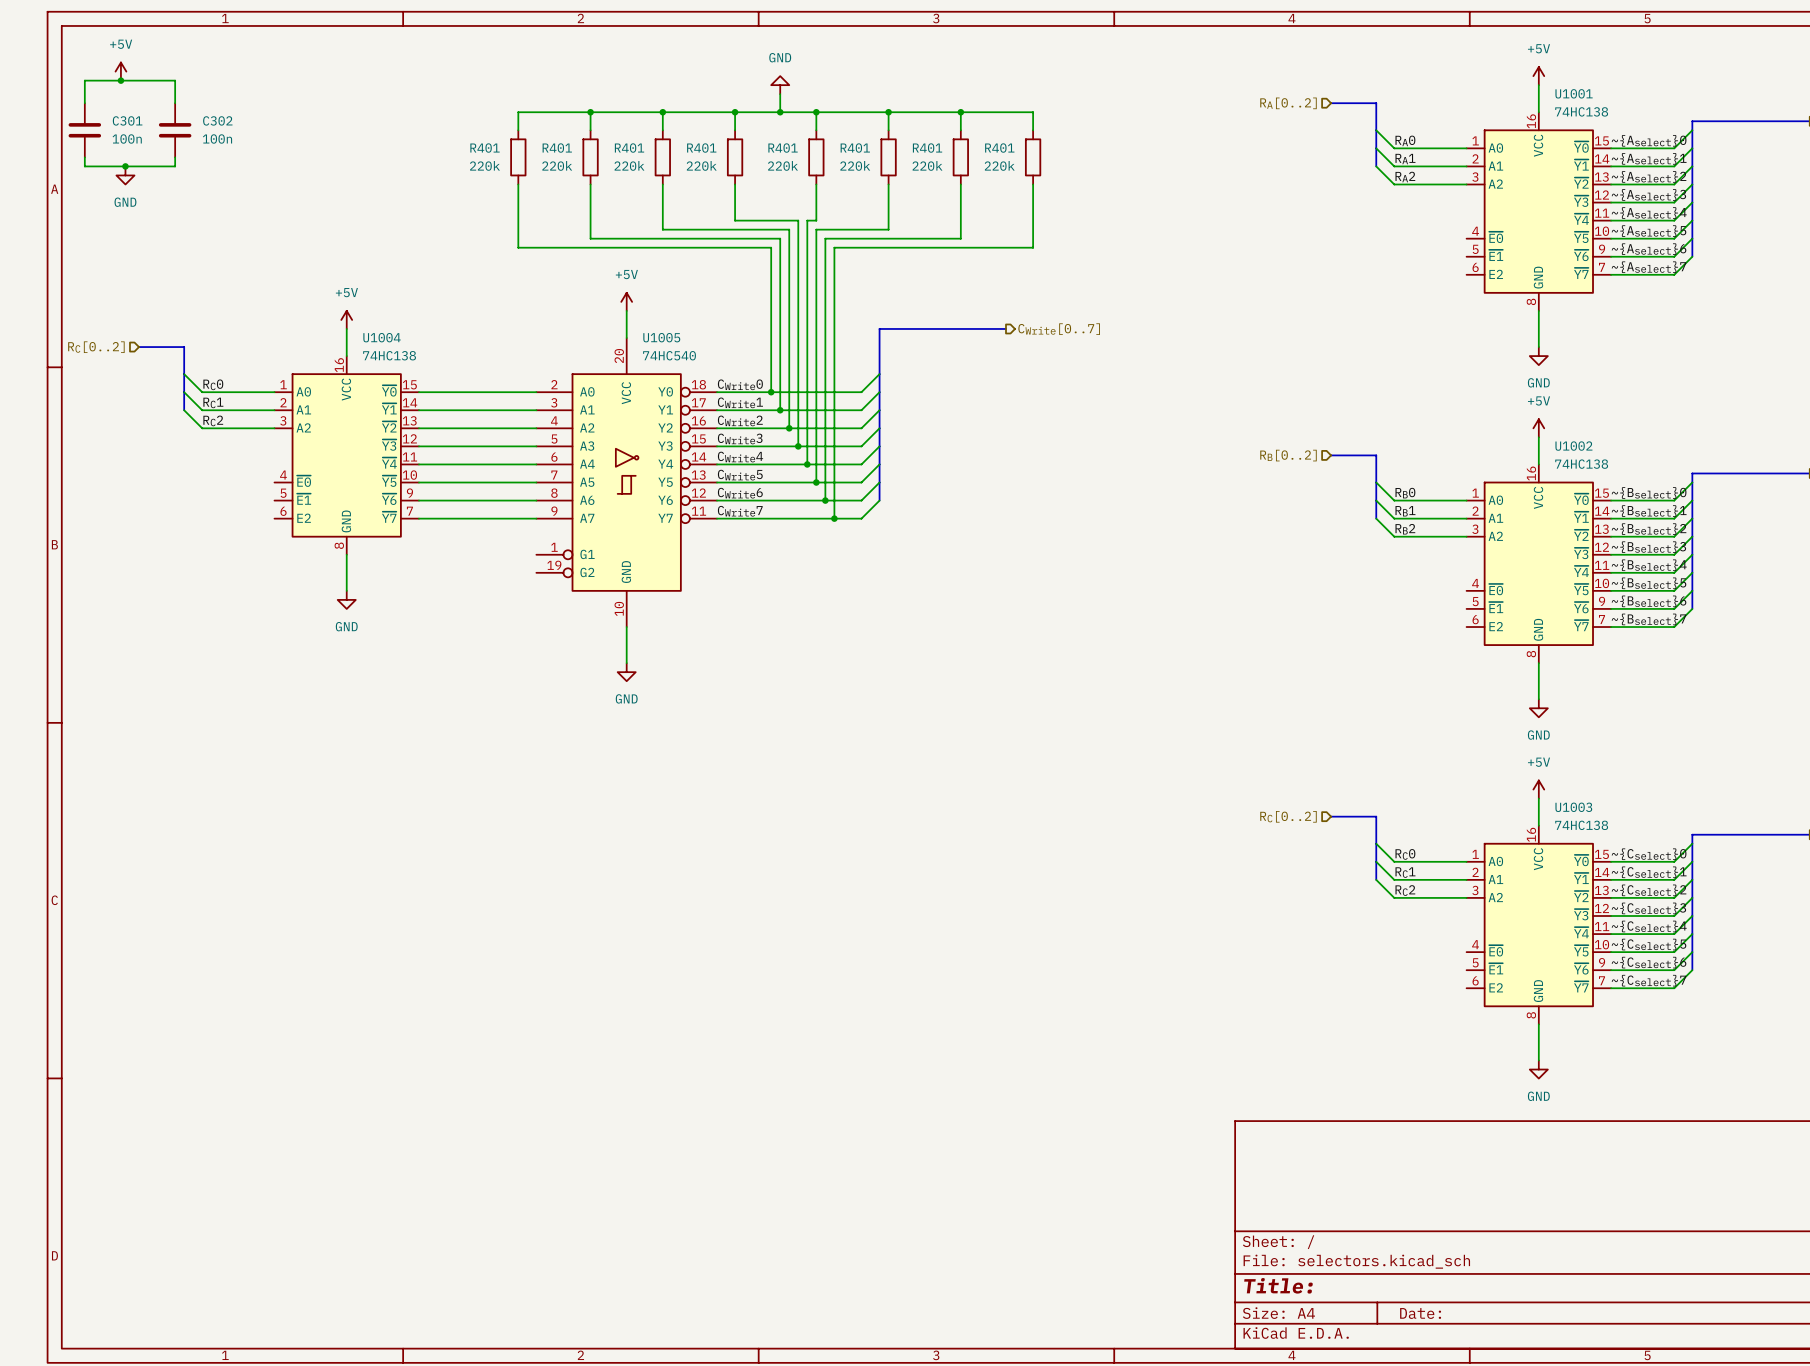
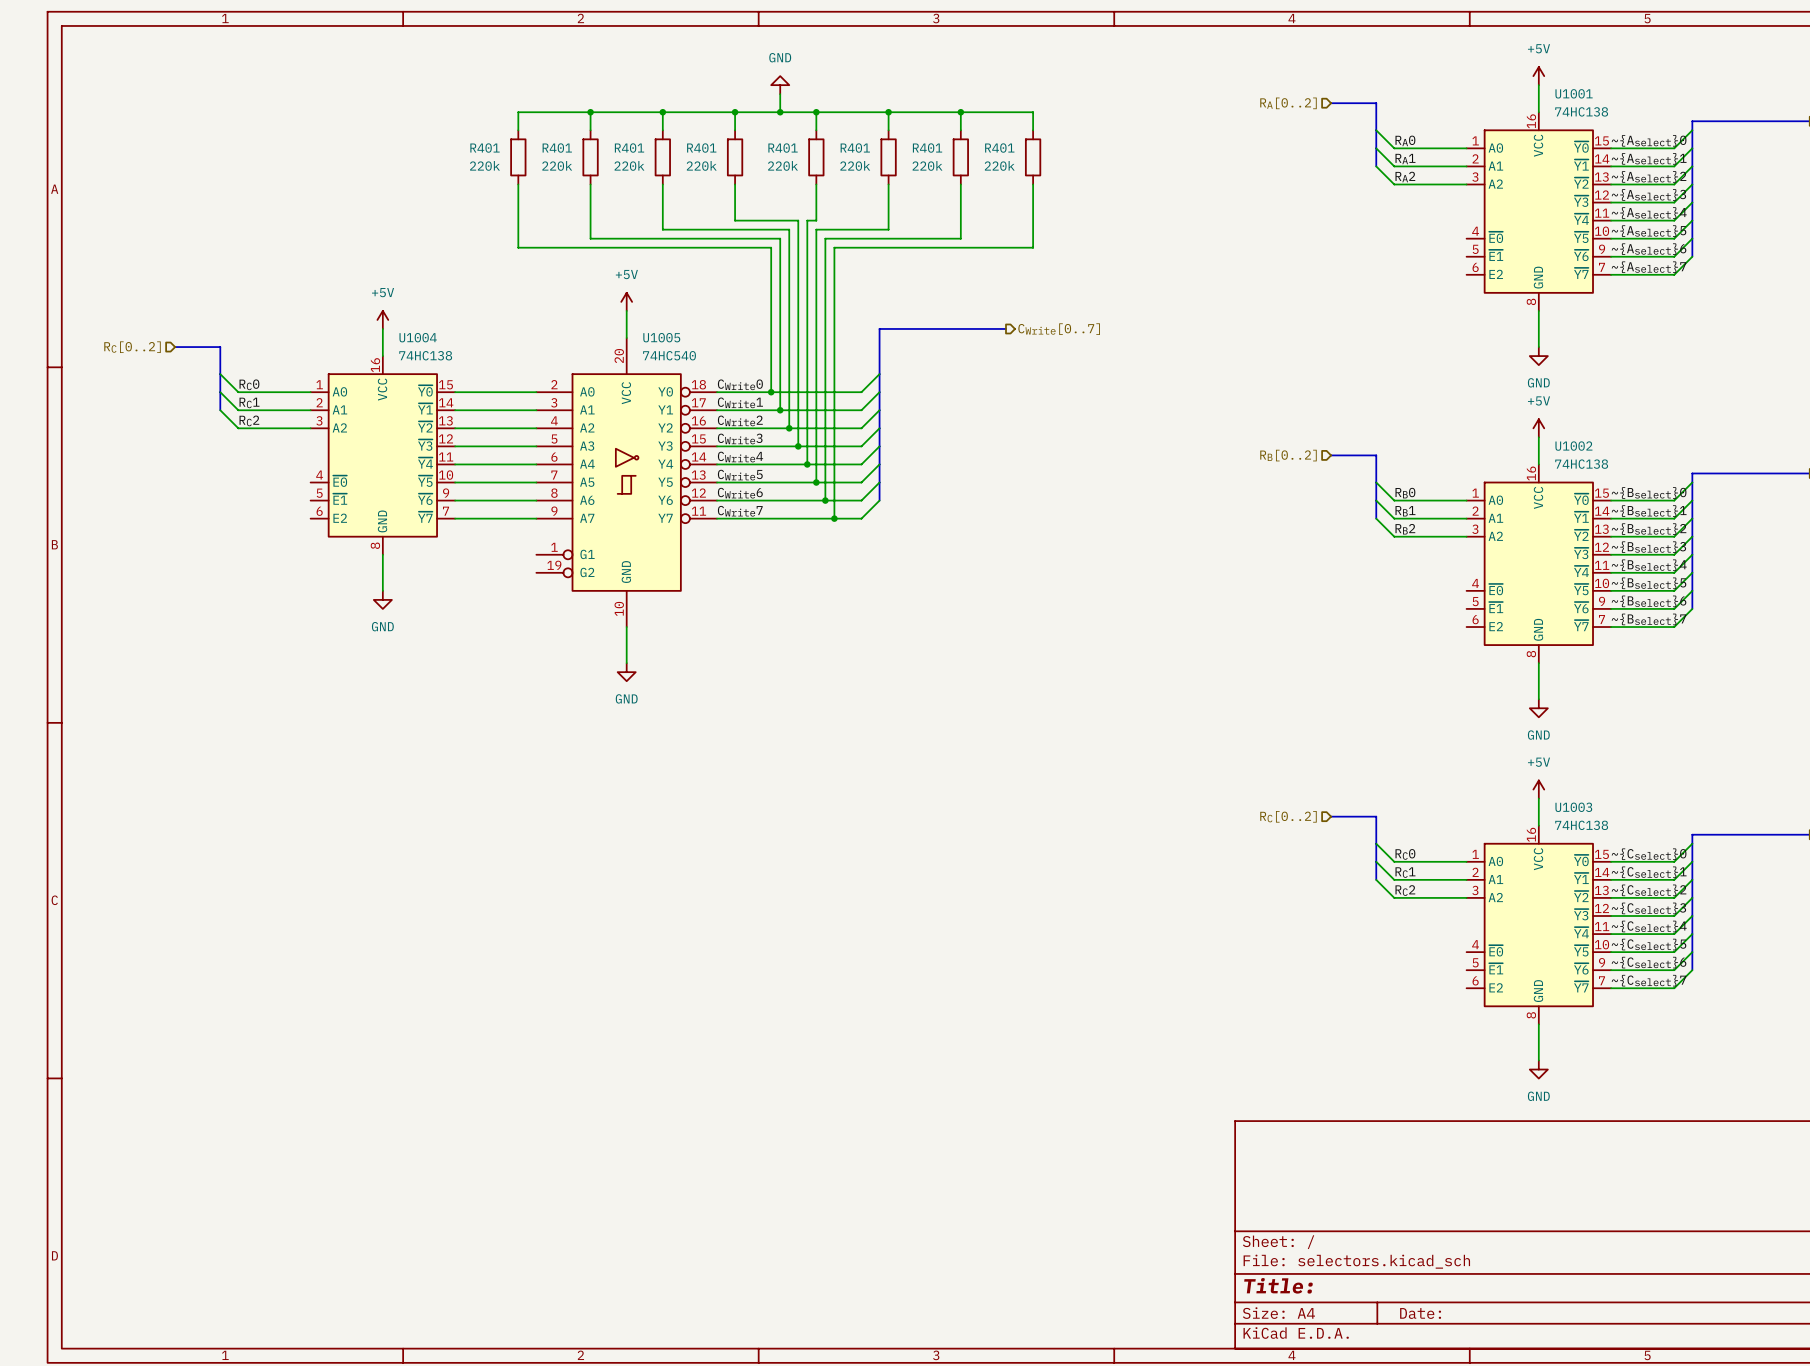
power symbol: +5V (120, 71) -> none
junction: (120, 80) -> none
wire: (84, 103) (84, 80) (175, 80) (175, 103) -> none
C301: 100n (84, 130) -> none
C302: 100n (175, 130) -> none
wire: (84, 157) (84, 166) (175, 166) (175, 157) -> none
junction: (125, 166) -> none
power symbol: GND (125, 175) -> none
power symbol position: +5V (346, 319) -> +5V (382, 319)
wire: (346, 328) (346, 356) -> (382, 328) (382, 356)
hierarchical label position: RC[0..2] (96, 347) -> RC[0..2] (132, 347)
bus: (139, 347) (175, 347) -> none
bus: (184, 347) (184, 410) -> (184, 347) (220, 347) (220, 410)
wire: (184, 374) (202, 392) (238, 392) -> (220, 374) (238, 392)
label position: RC0 (213, 384) -> RC0 (249, 384)
wire: (184, 392) (202, 410) (238, 410) -> (220, 392) (238, 410)
label position: RC1 (213, 402) -> RC1 (249, 402)
wire: (184, 410) (202, 428) (238, 428) -> (220, 410) (238, 428)
label position: RC2 (213, 420) -> RC2 (249, 420)
U1004 position: (346, 455) -> (382, 455)
wire: (346, 554) (346, 590) -> (382, 554) (382, 590)
power symbol position: GND (346, 599) -> GND (382, 599)

